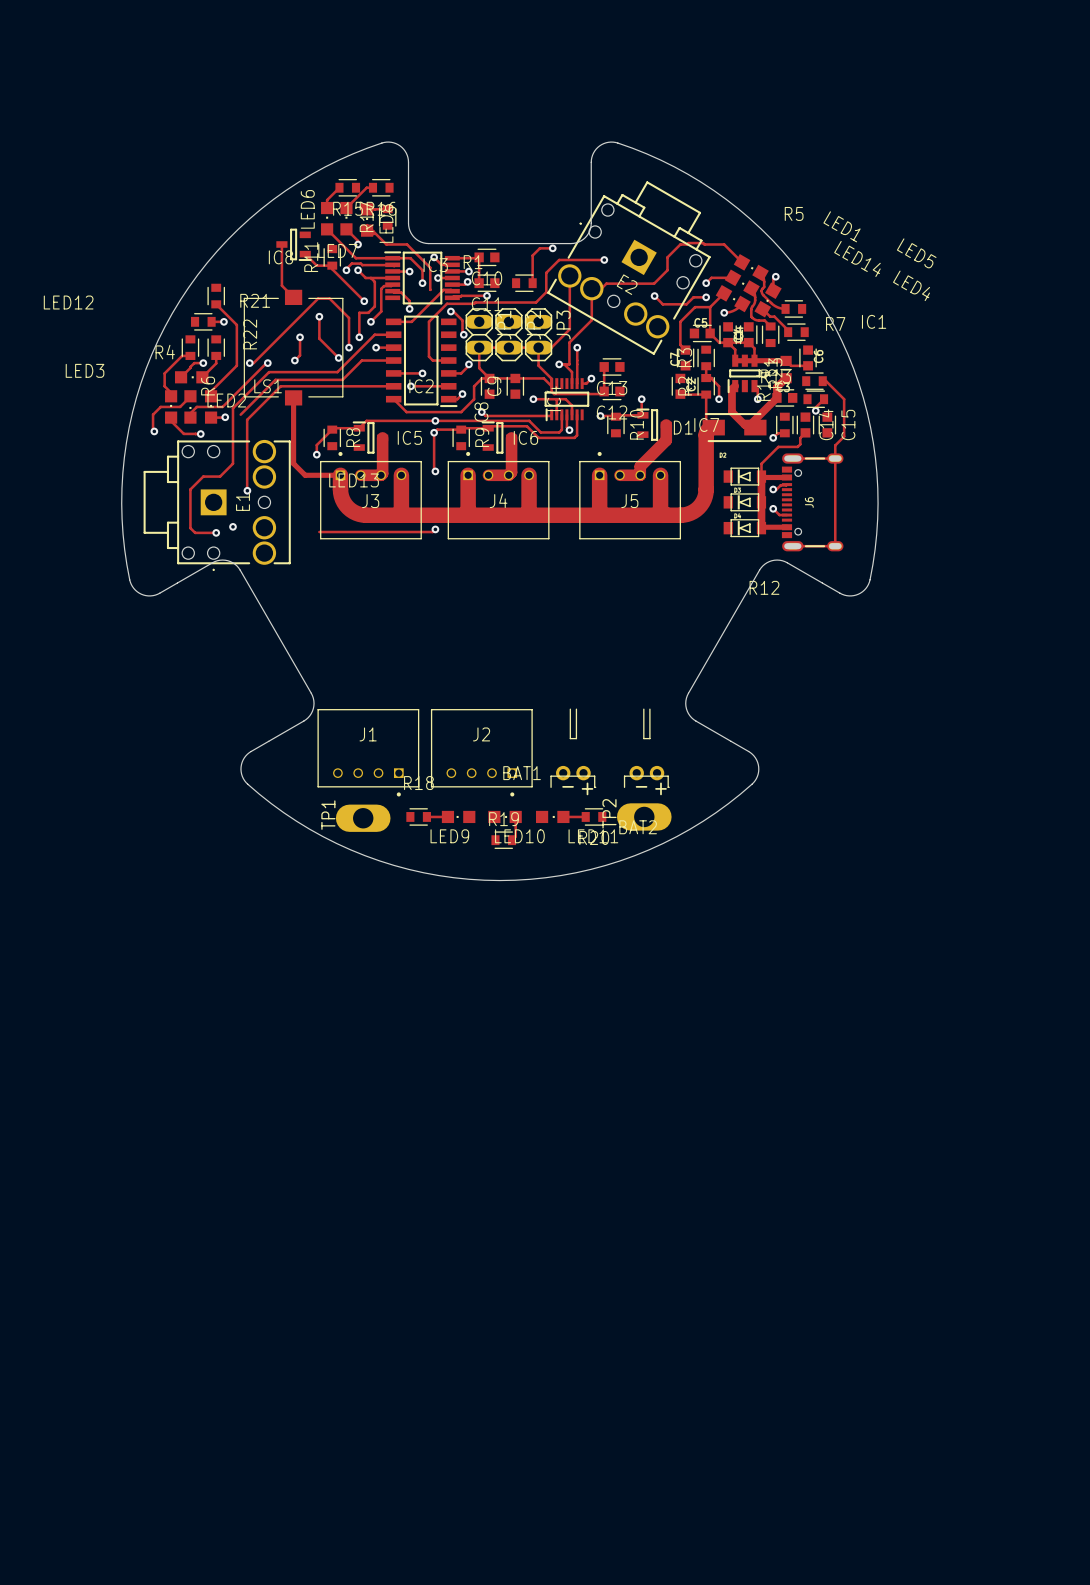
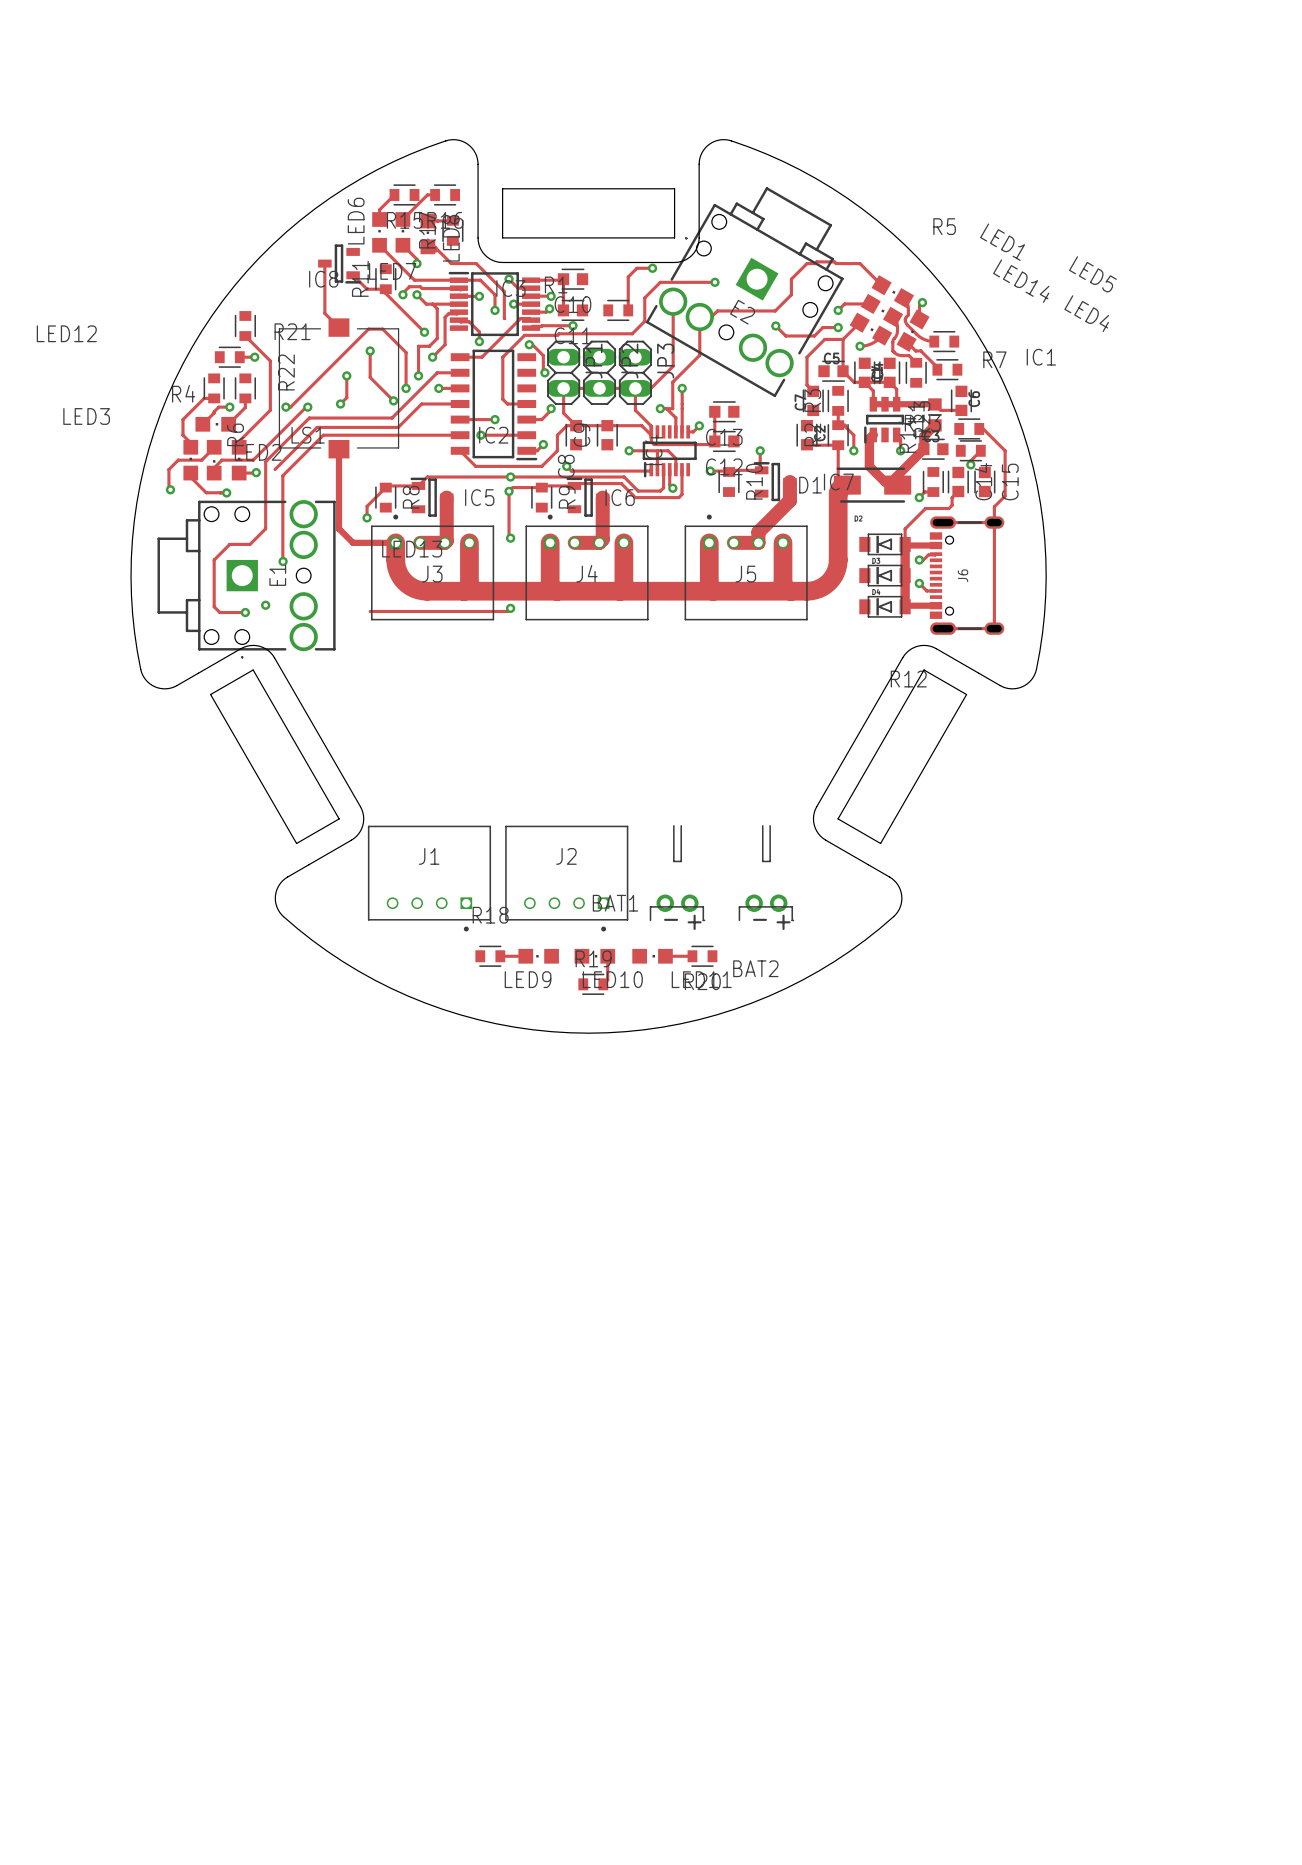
board edge: none -> (502, 188) (674, 188) (674, 237) (502, 237) (502, 188)
board edge: none -> (253, 669) (339, 818) (296, 843) (210, 694) (253, 669)
board edge: none -> (924, 669) (838, 818) (880, 843) (966, 694) (924, 669)
TP2: (644, 816) -> none
TP1: (363, 818) -> none

